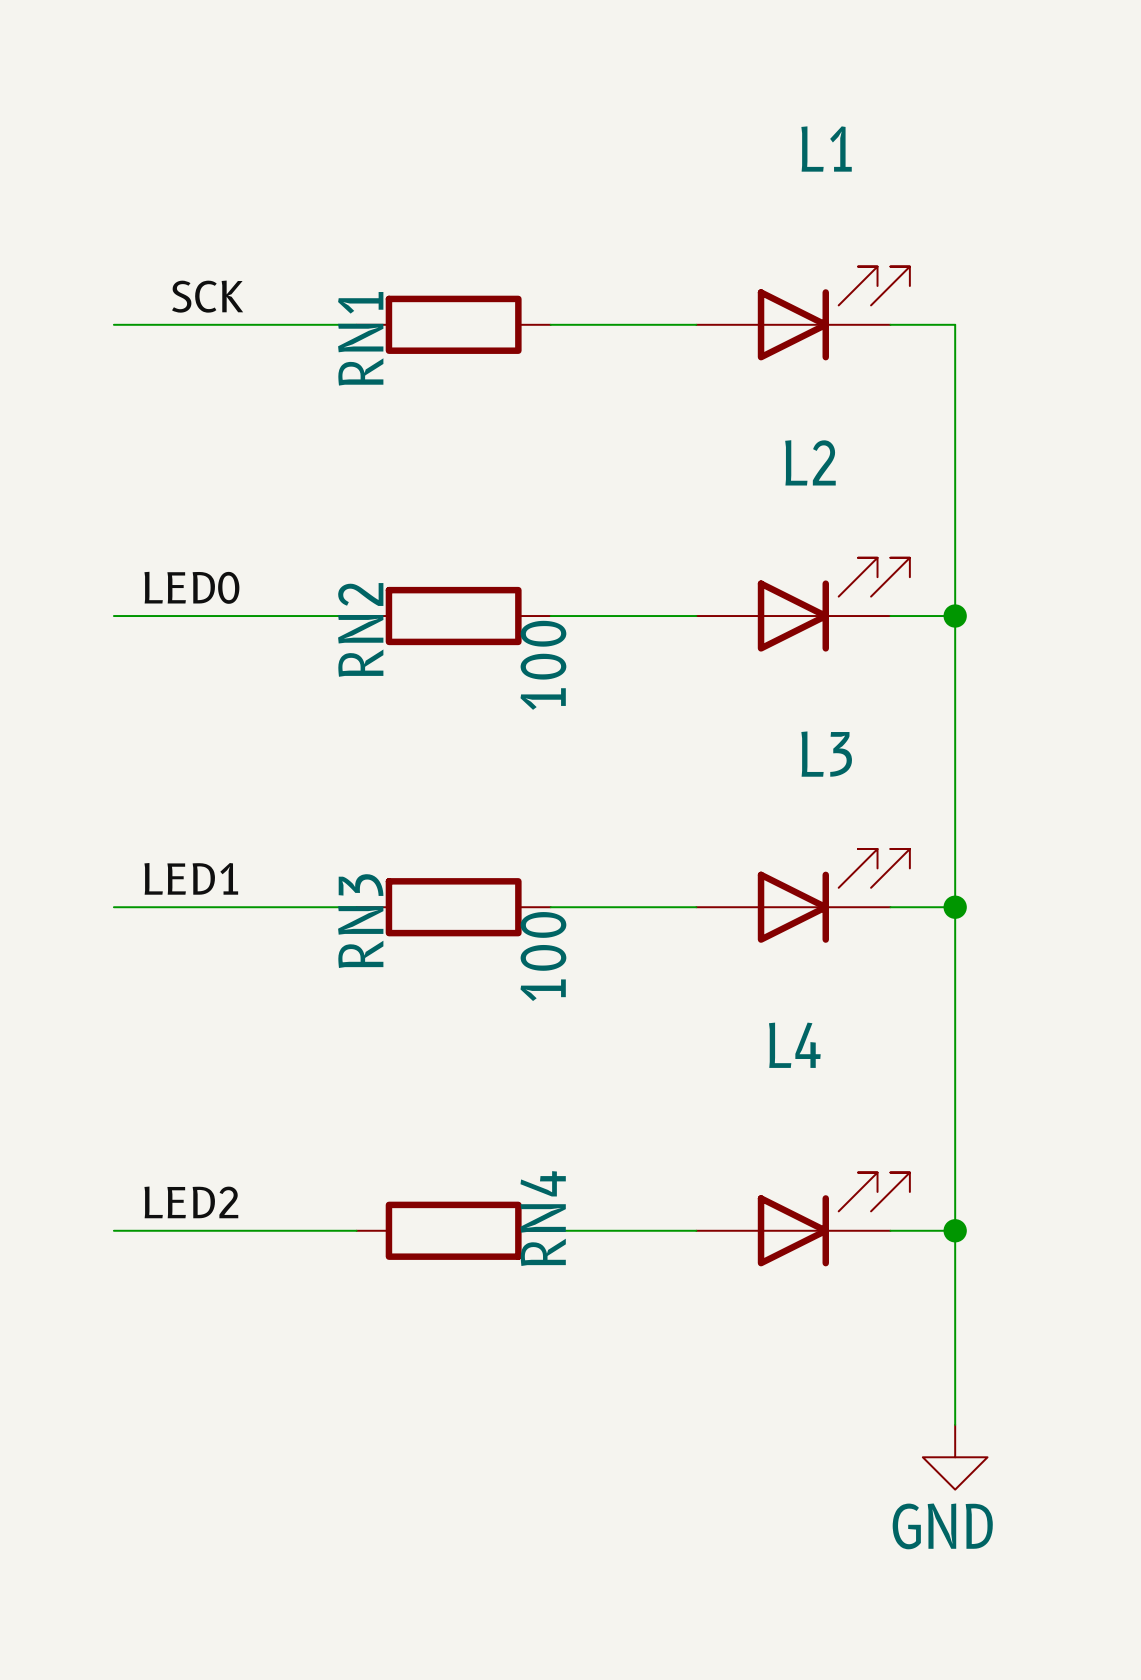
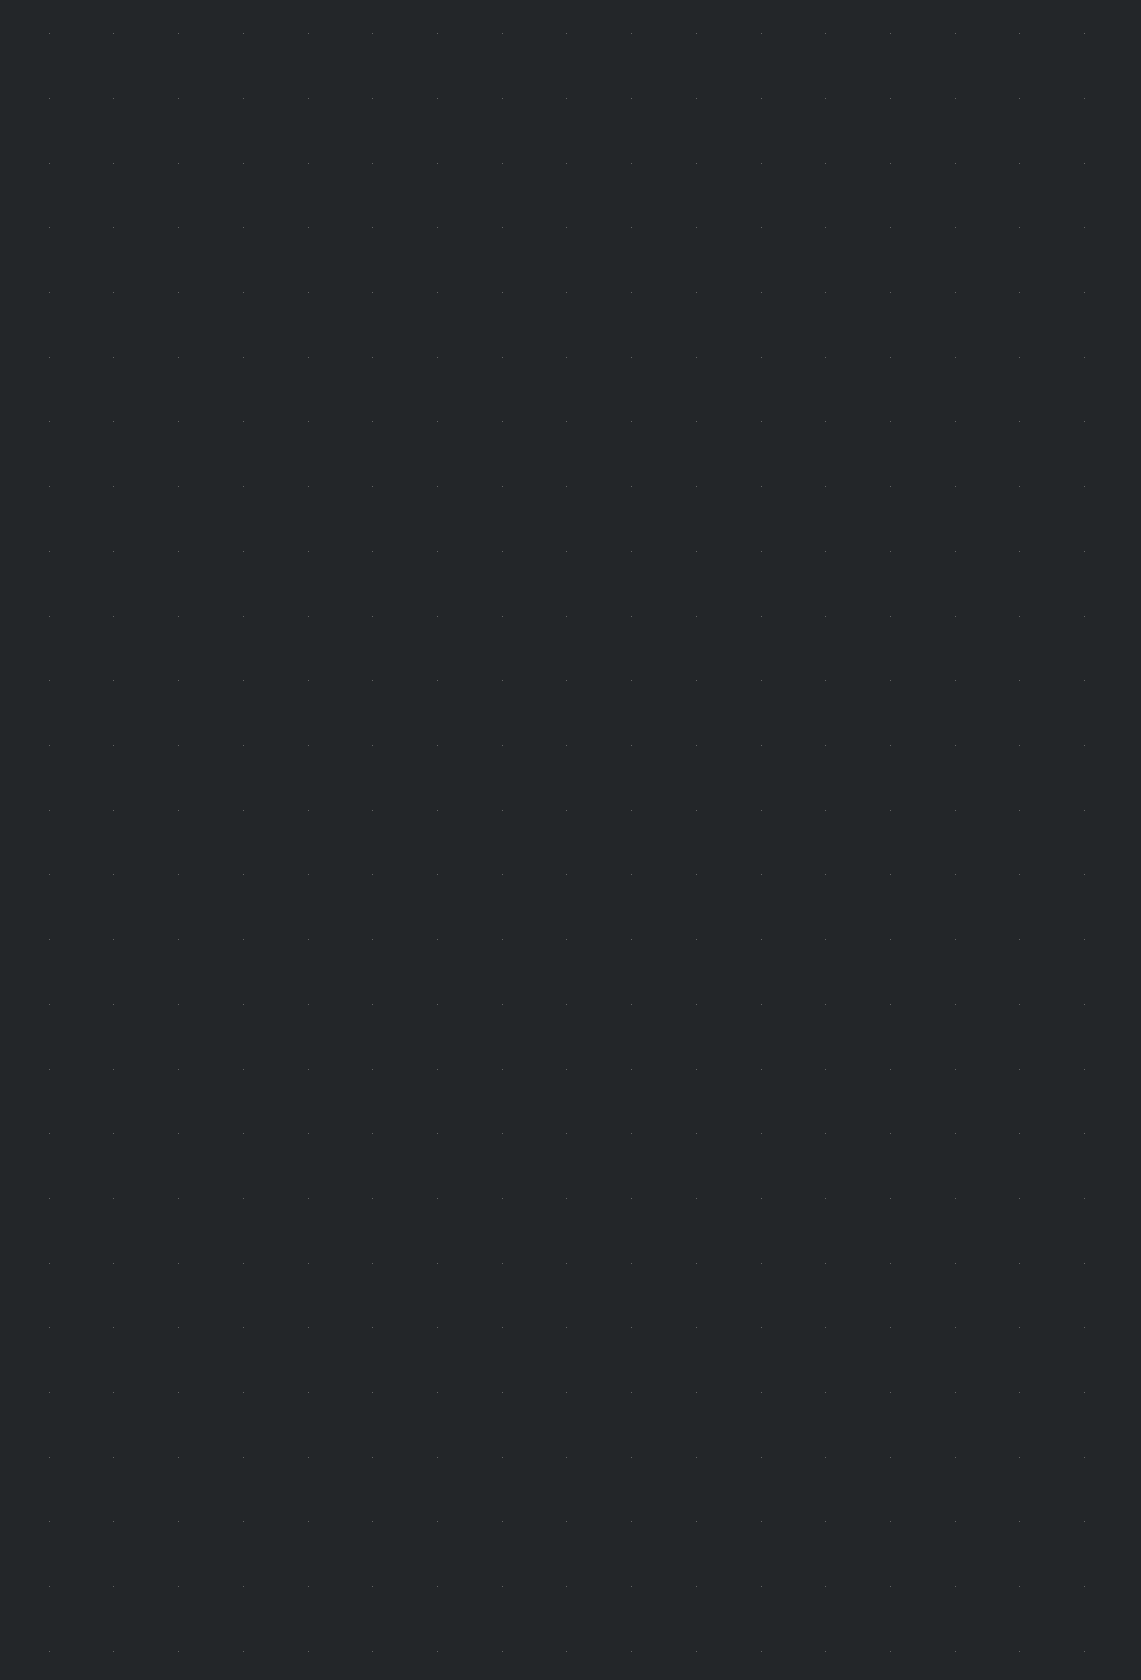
label: SCK (207, 296) -> none
L1: (803, 313) -> none
wire: (113, 324) (356, 324) -> none
RN1: (453, 324) -> none
wire: (550, 324) (696, 324) -> none
wire: (890, 324) (955, 324) (955, 1424) -> none
label: LED0 (191, 587) -> none
L2: (803, 604) -> none
wire: (113, 616) (356, 616) -> none
RN2: 100 (453, 616) -> none
wire: (550, 616) (696, 616) -> none
wire: (890, 616) (955, 616) -> none
junction: (955, 616) -> none
label: LED1 (191, 878) -> none
L3: (803, 895) -> none
wire: (113, 907) (356, 907) -> none
RN3: 100 (453, 907) -> none
wire: (550, 907) (696, 907) -> none
wire: (890, 907) (955, 907) -> none
junction: (955, 907) -> none
label: LED2 (191, 1202) -> none
L4: (803, 1219) -> none
wire: (113, 1230) (356, 1230) -> none
RN4: (453, 1230) -> none
wire: (550, 1230) (696, 1230) -> none
wire: (890, 1230) (955, 1230) -> none
junction: (955, 1230) -> none
power symbol: GND (955, 1457) -> none

